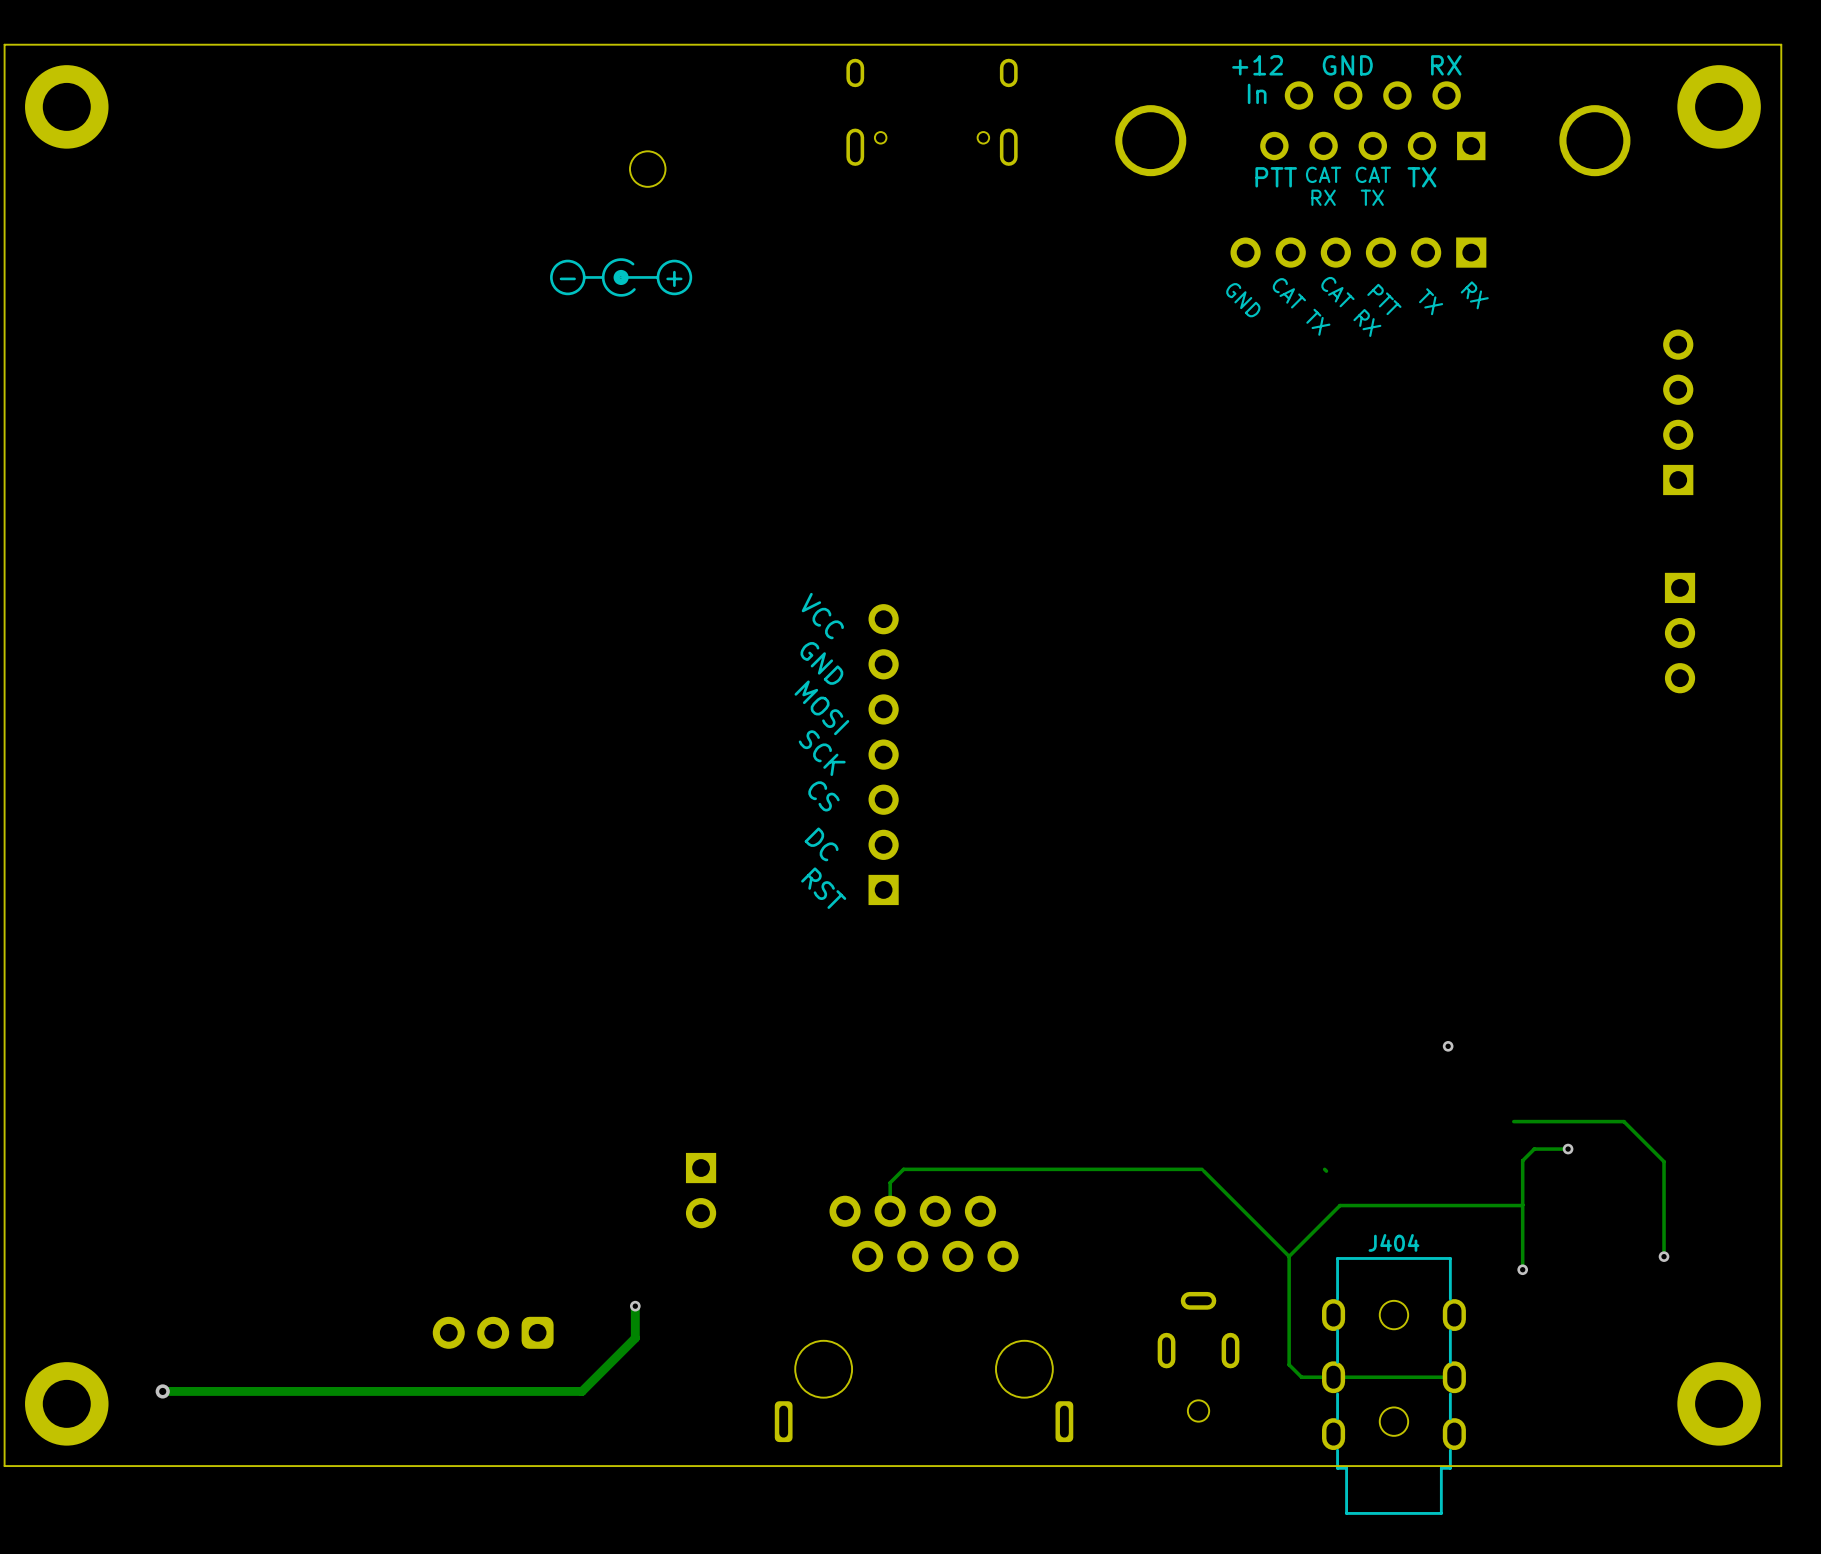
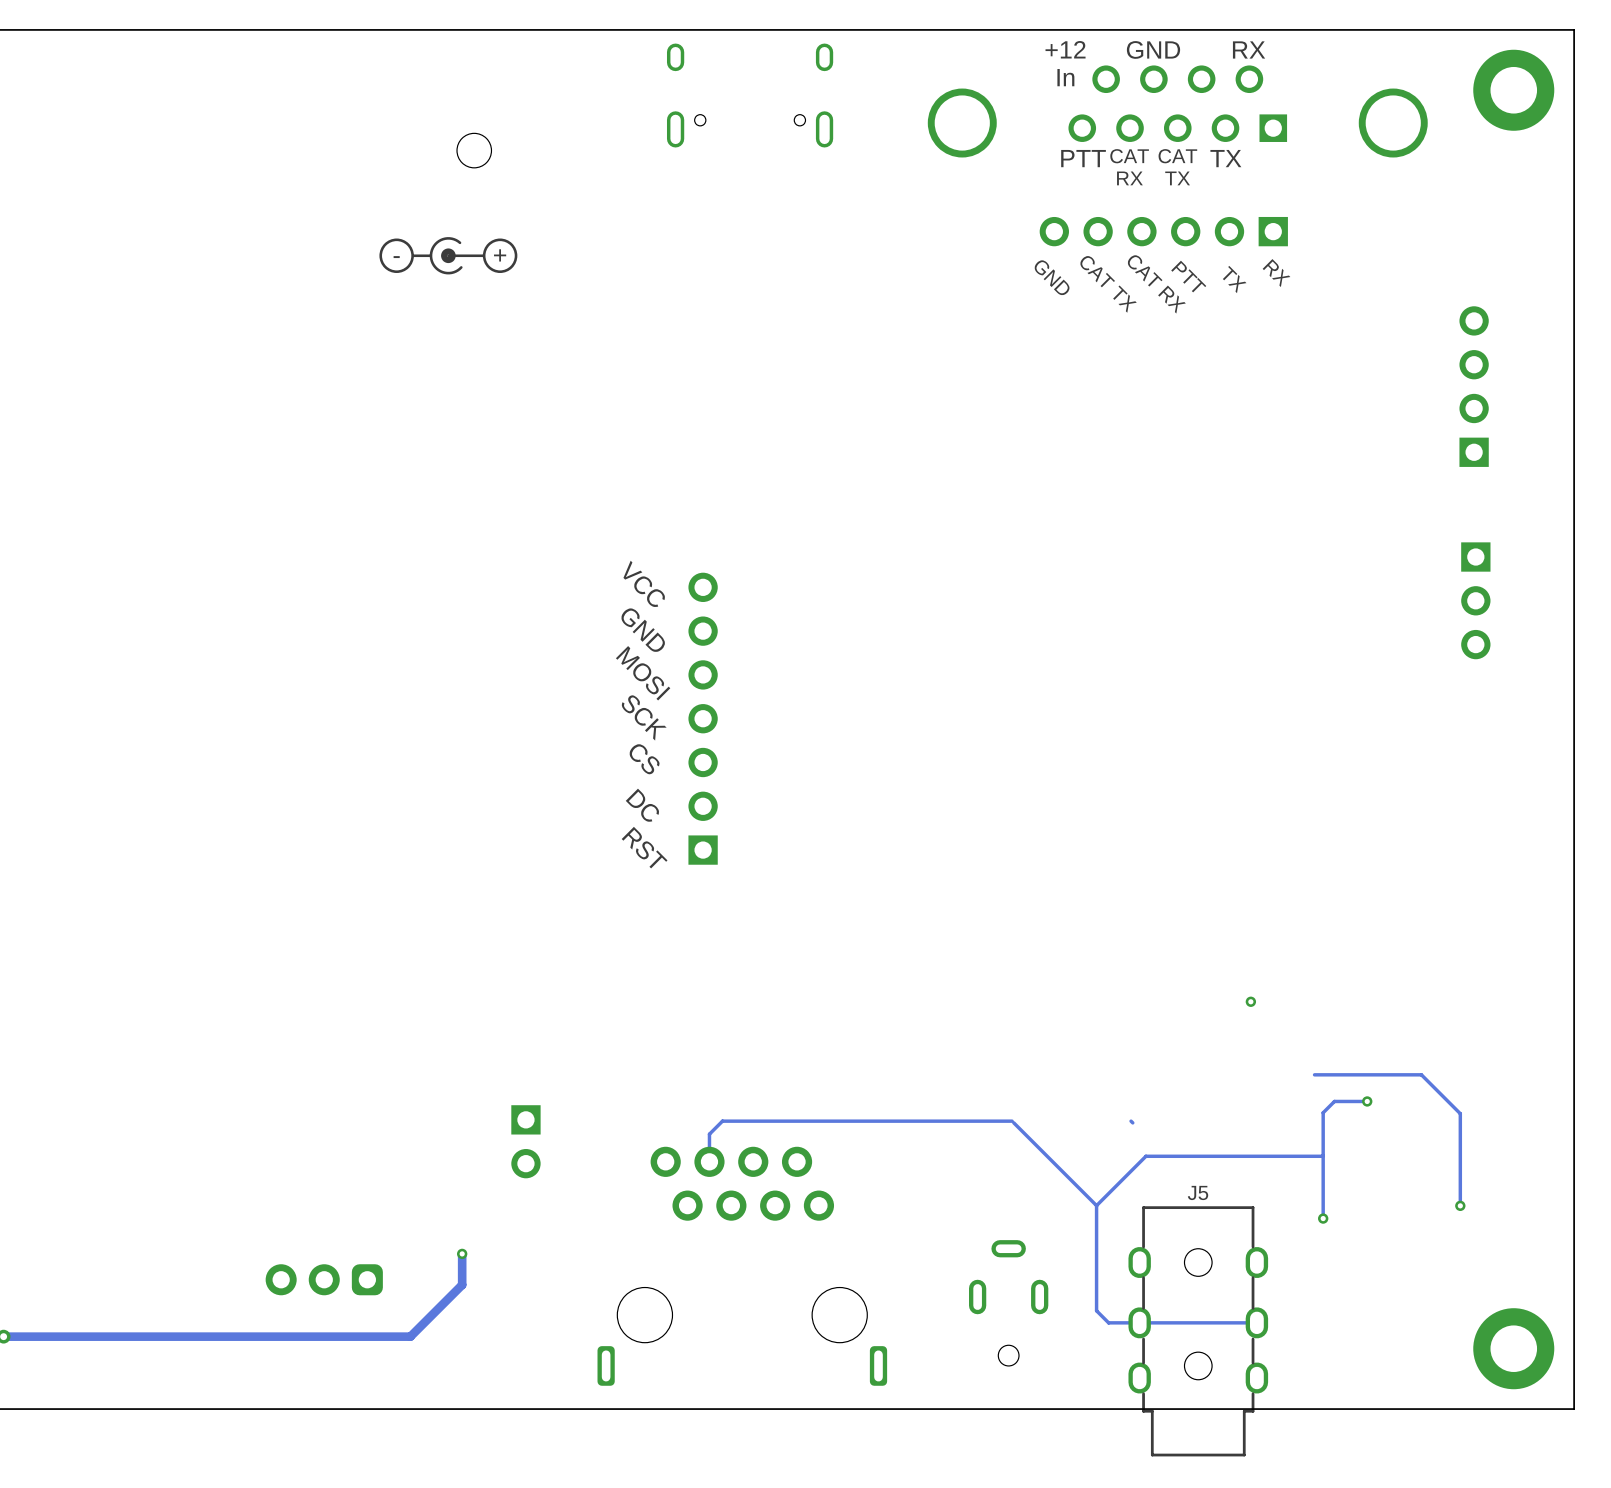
J404 name: J404 (1393, 1242) -> J5 (1198, 1192)

